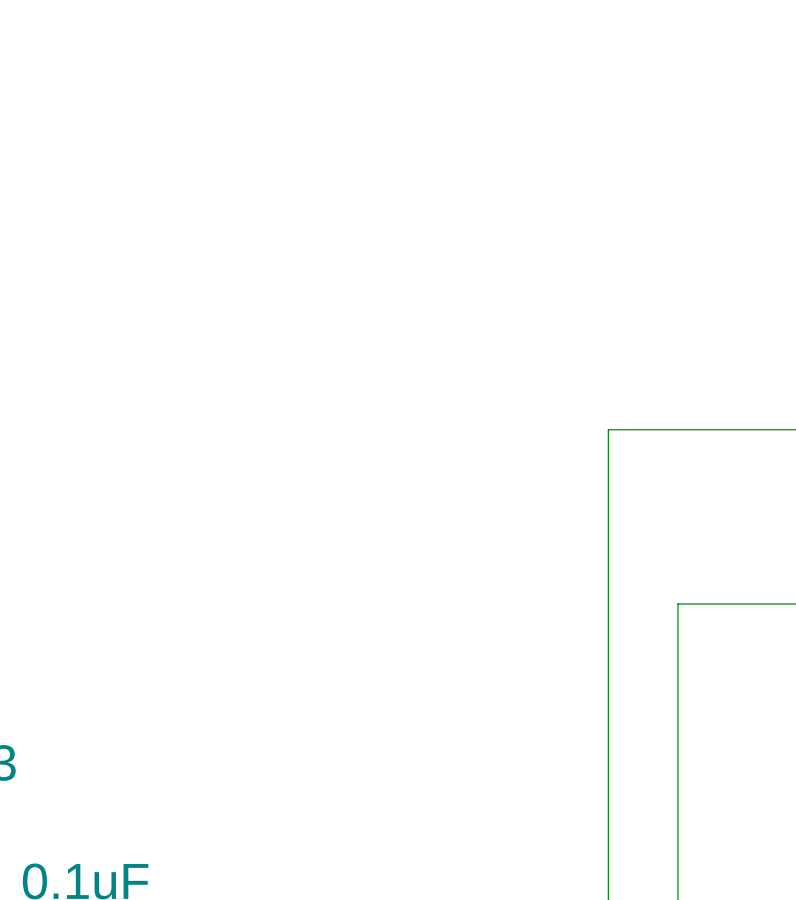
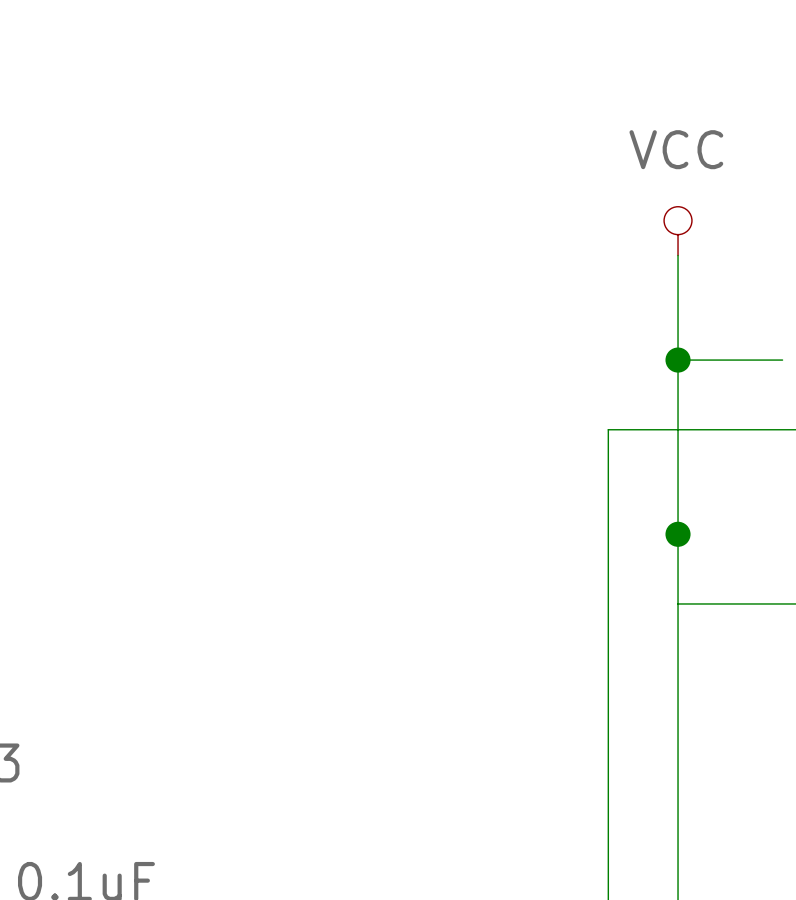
power symbol: none -> VCC (678, 231)
wire: none -> (678, 255) (678, 603)
wire: none -> (678, 360) (782, 360)
junction: none -> (678, 360)
junction: none -> (678, 534)

